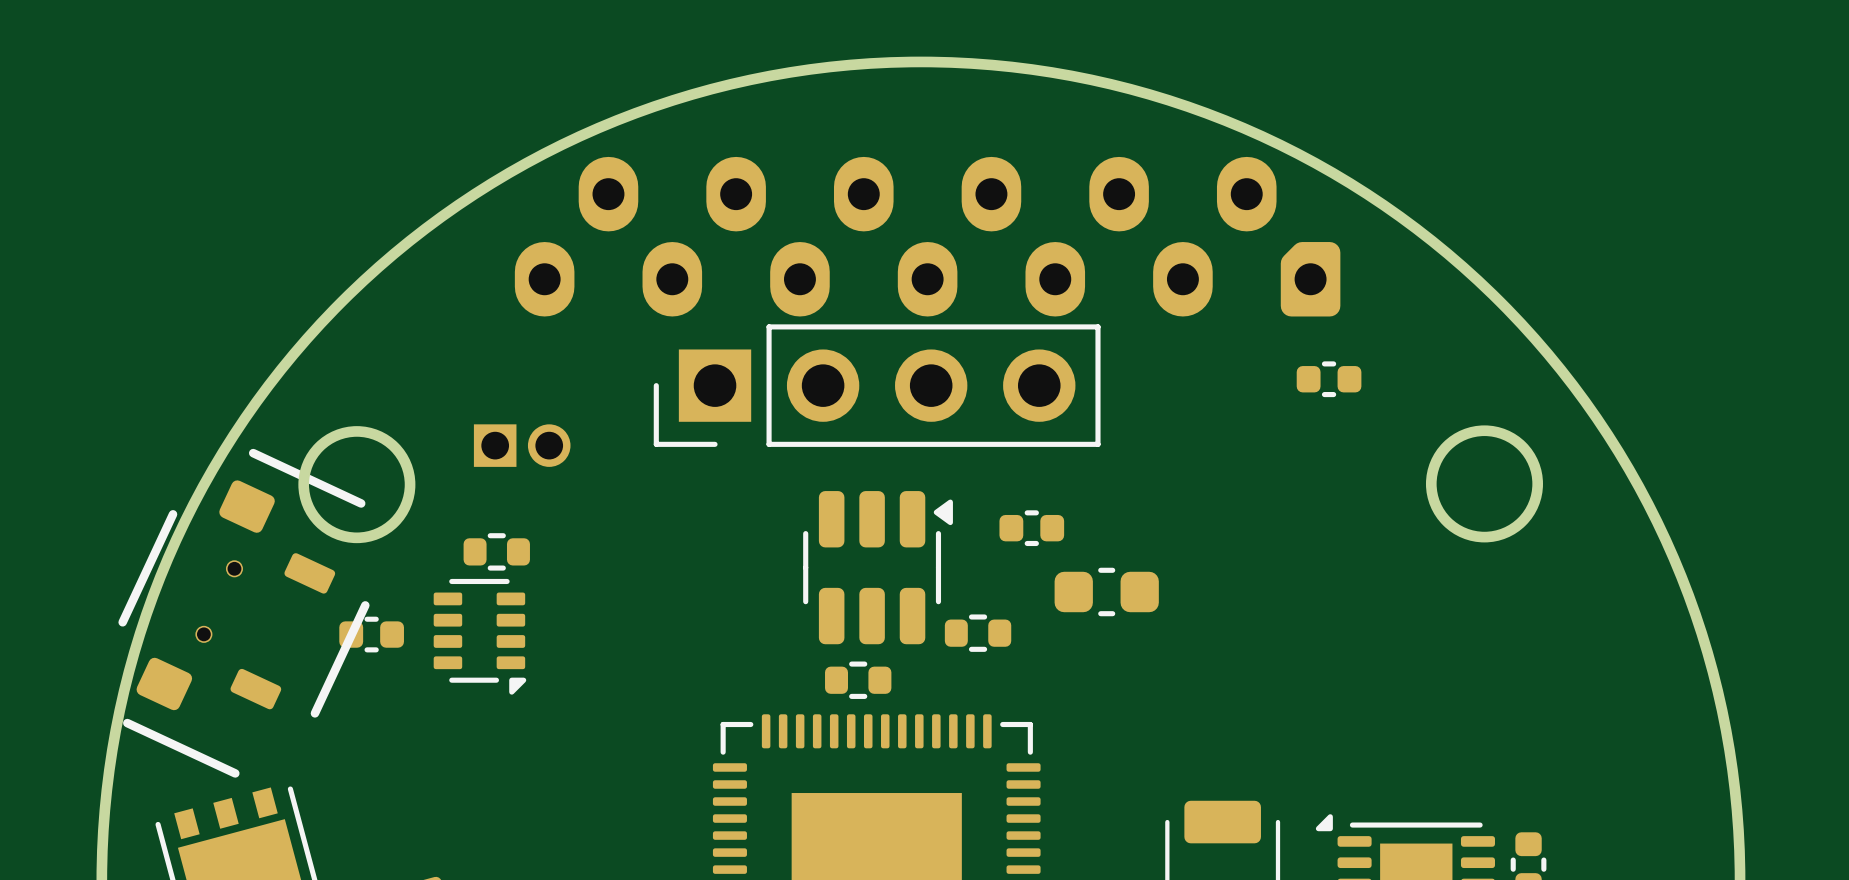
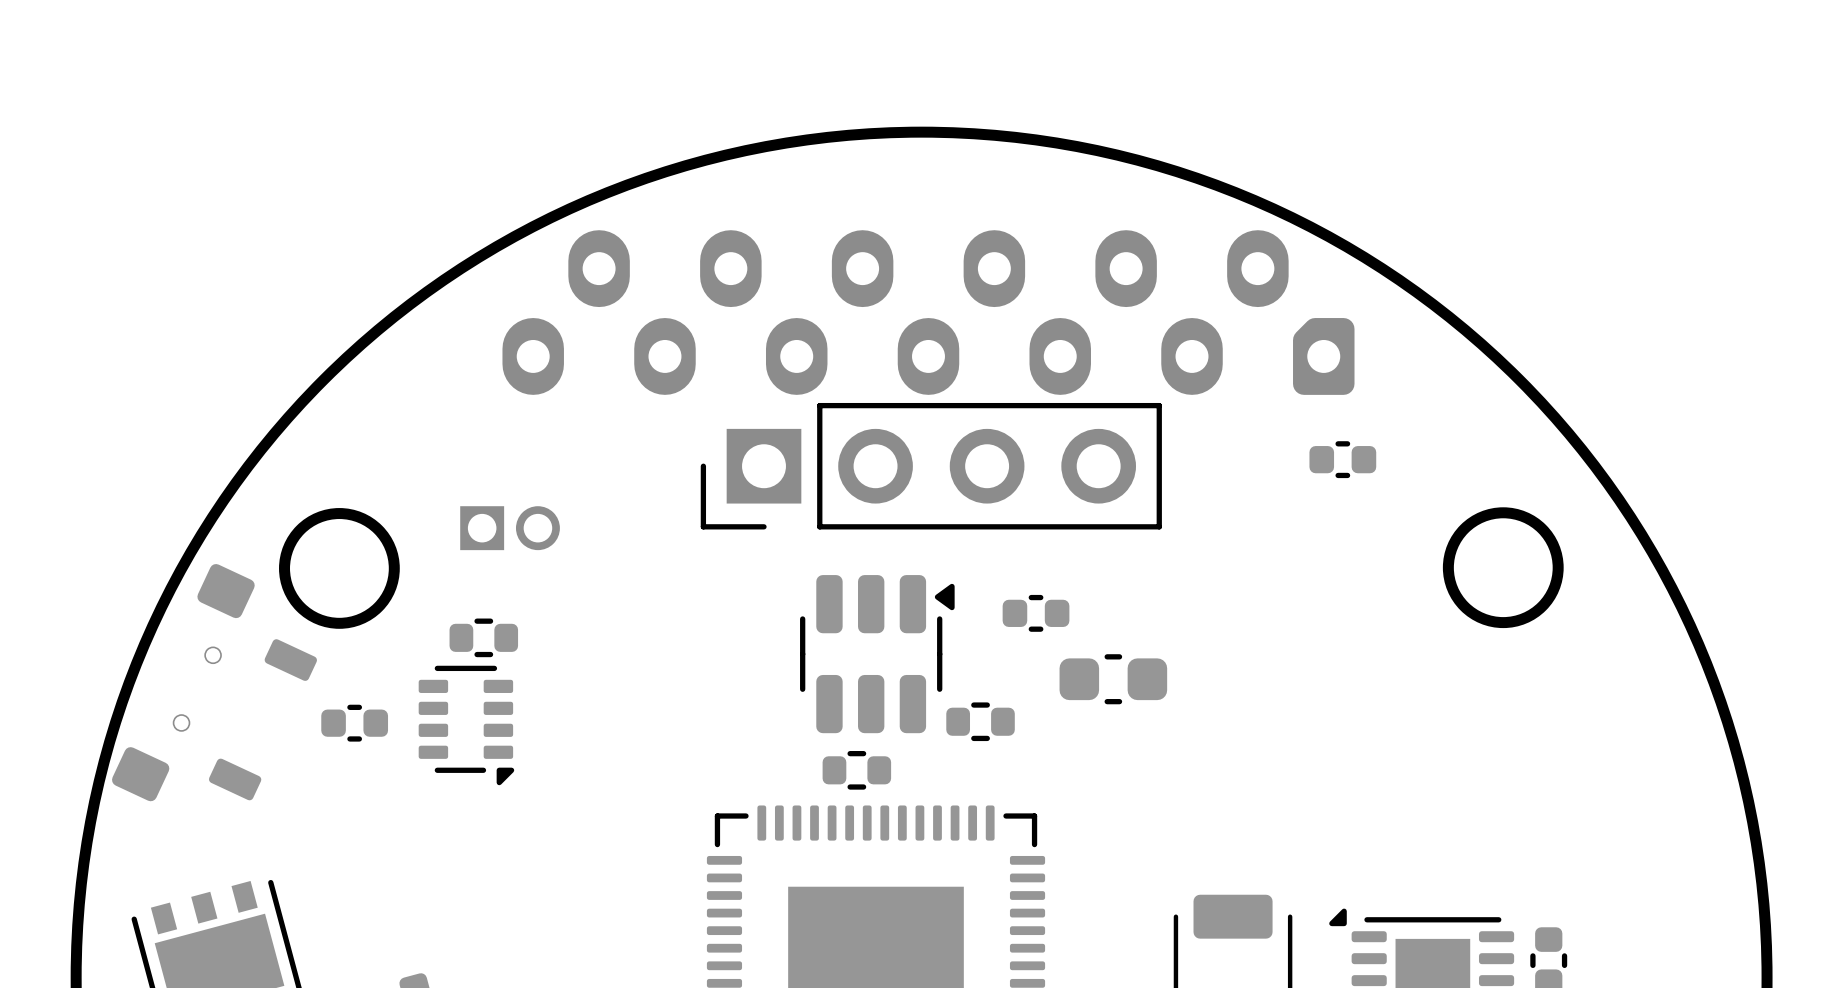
part position: (877, 385) -> (931, 466)
part footprint: [118, 448, 370, 778] -> [112, 564, 317, 802]

